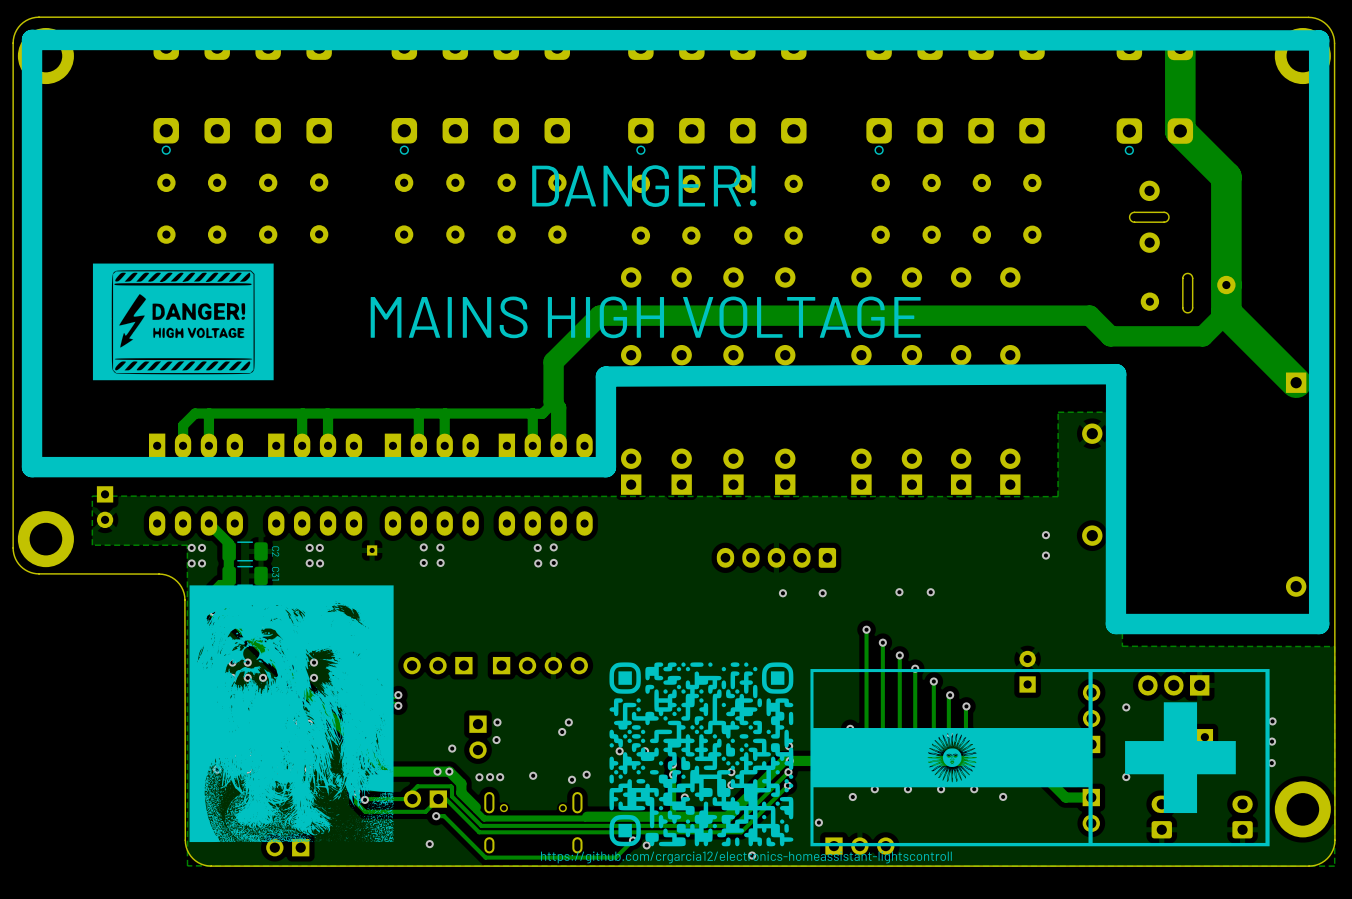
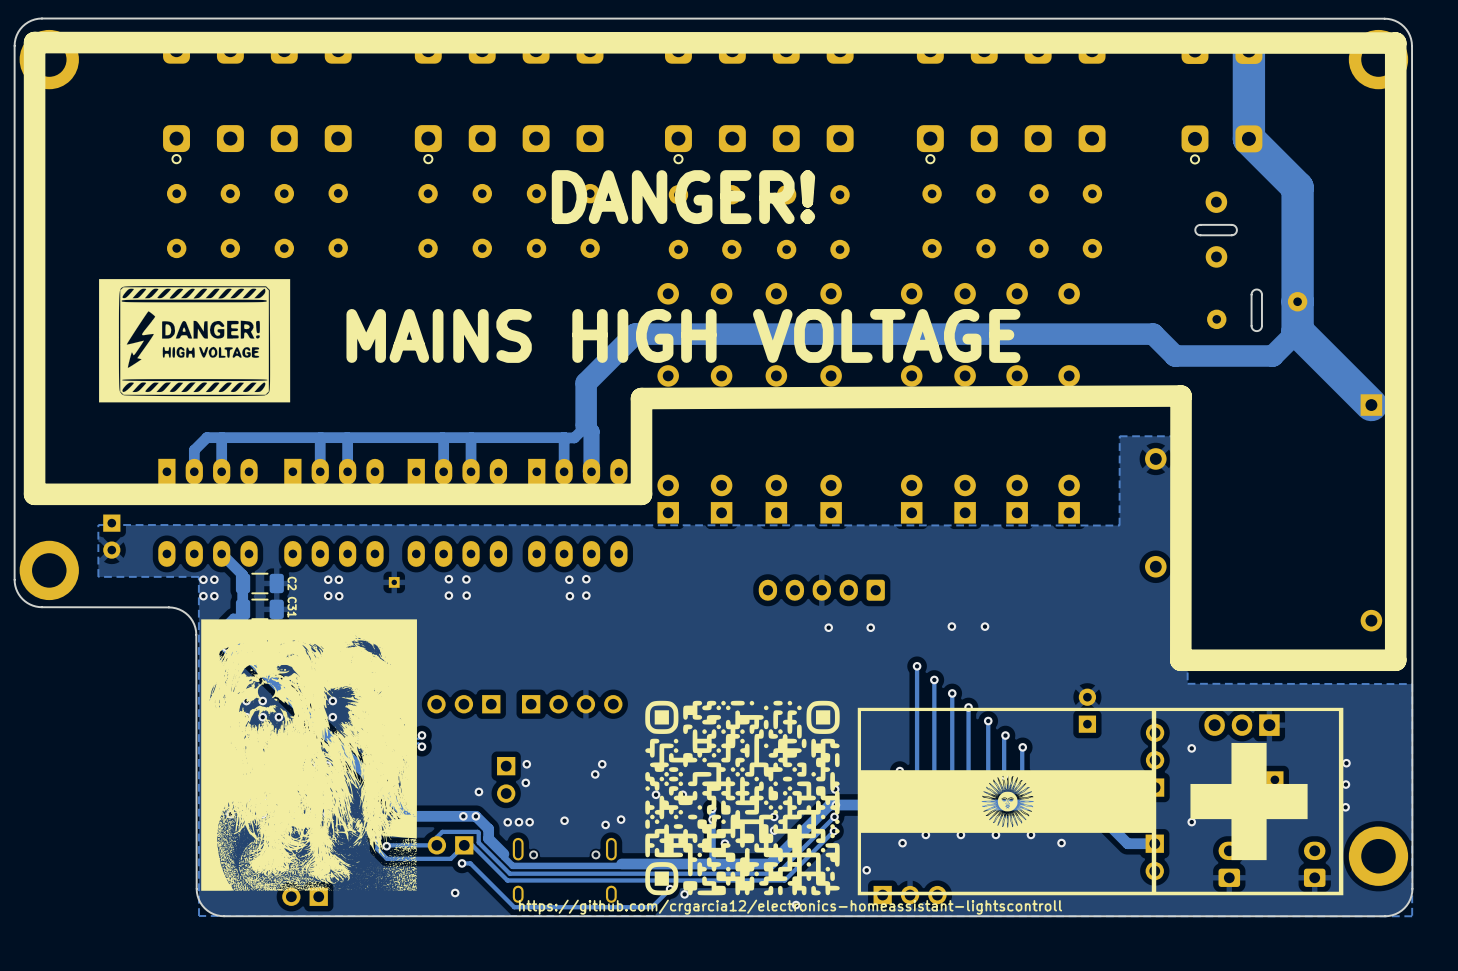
via: (1045, 535) -> none
via: (1045, 555) -> none

